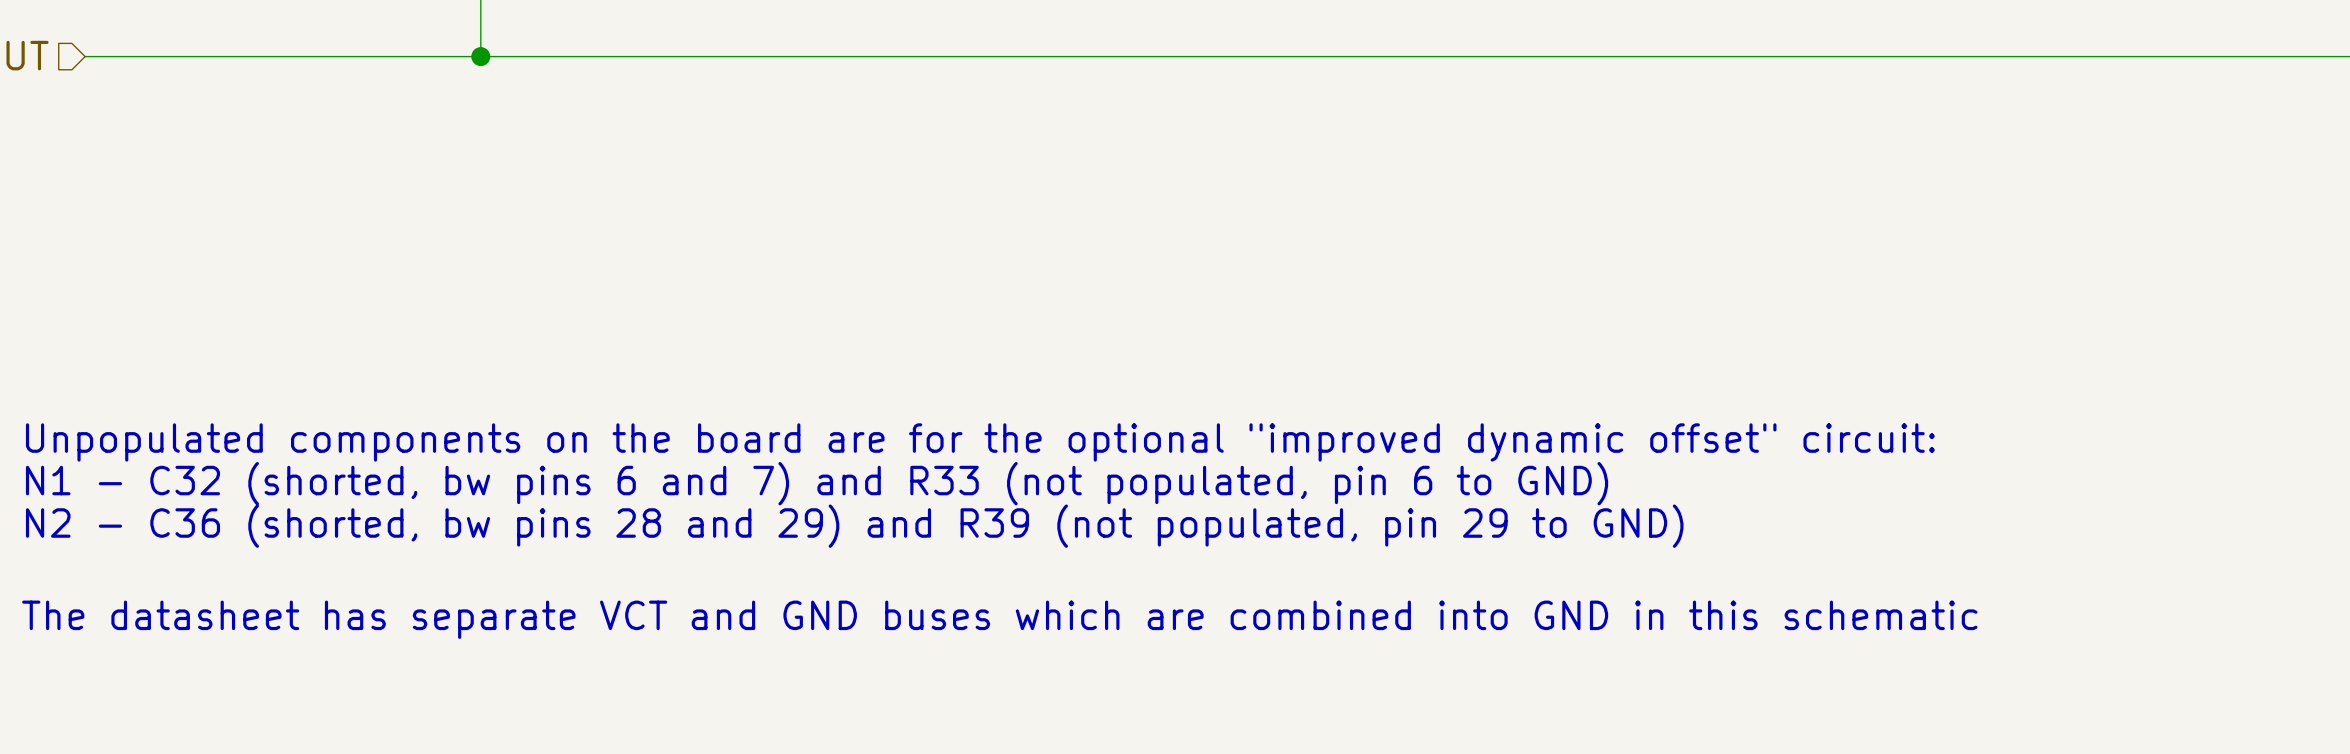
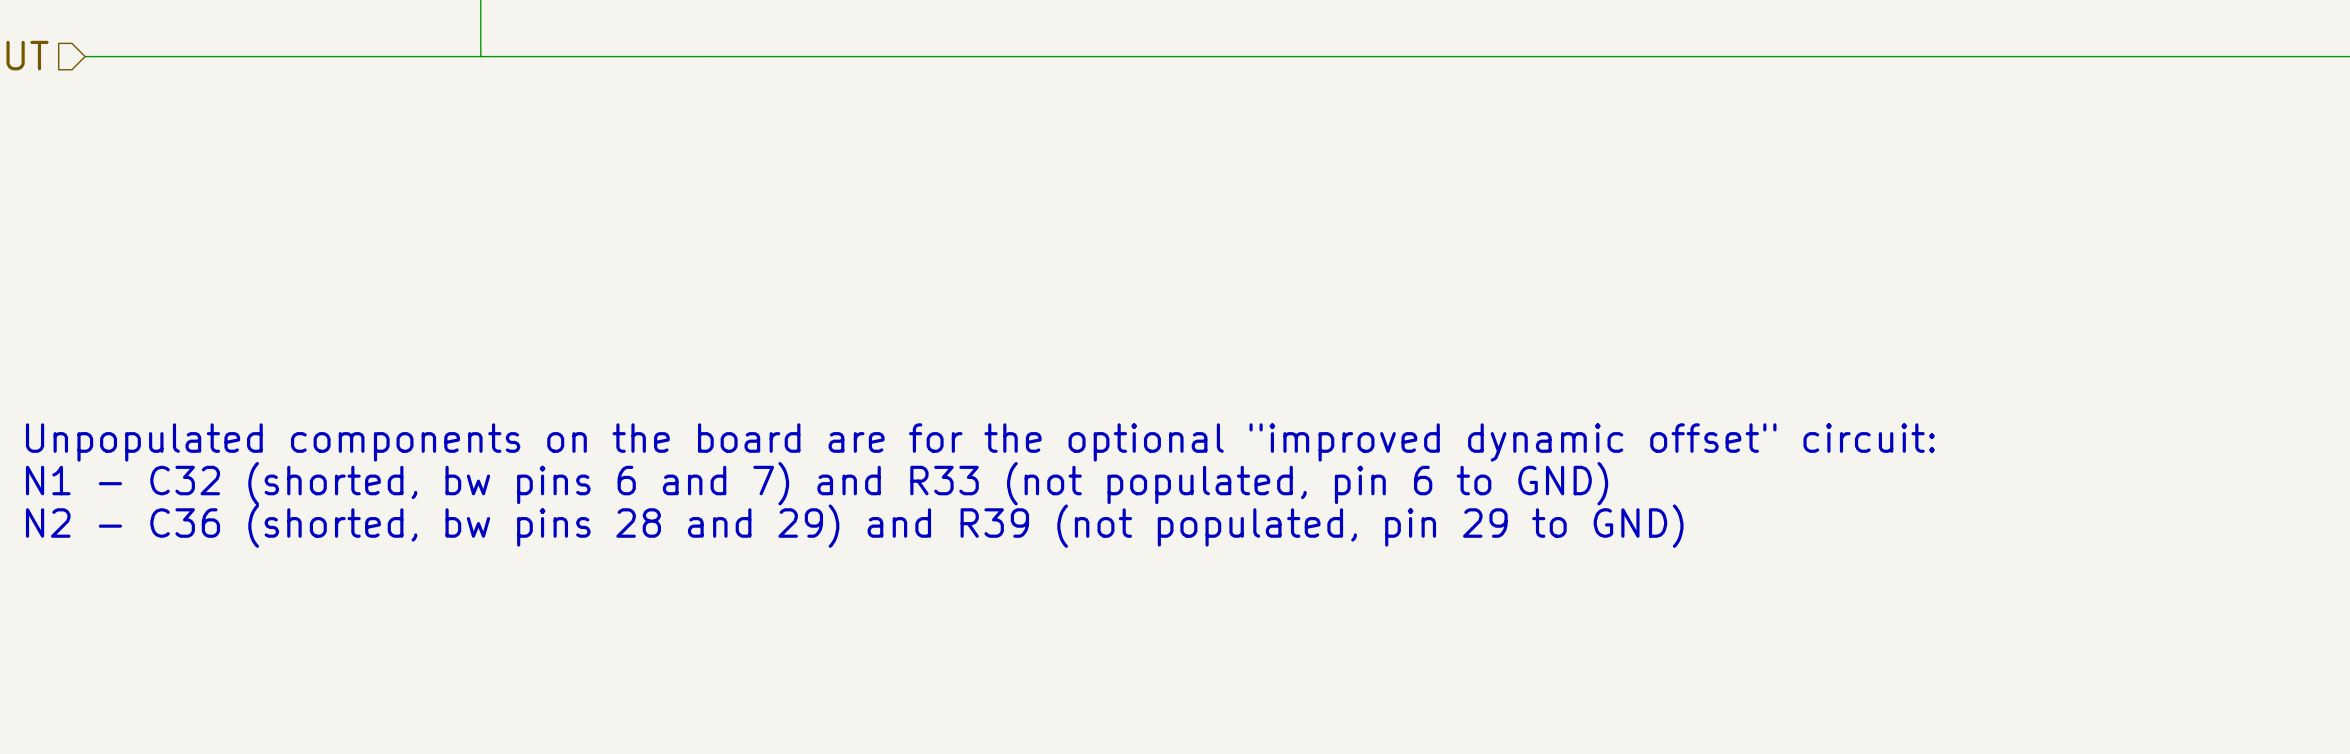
junction: (480, 56) -> none
text: The datasheet has separate VCT and GND buses which are combined into GND in this schematic (999, 619) -> none

